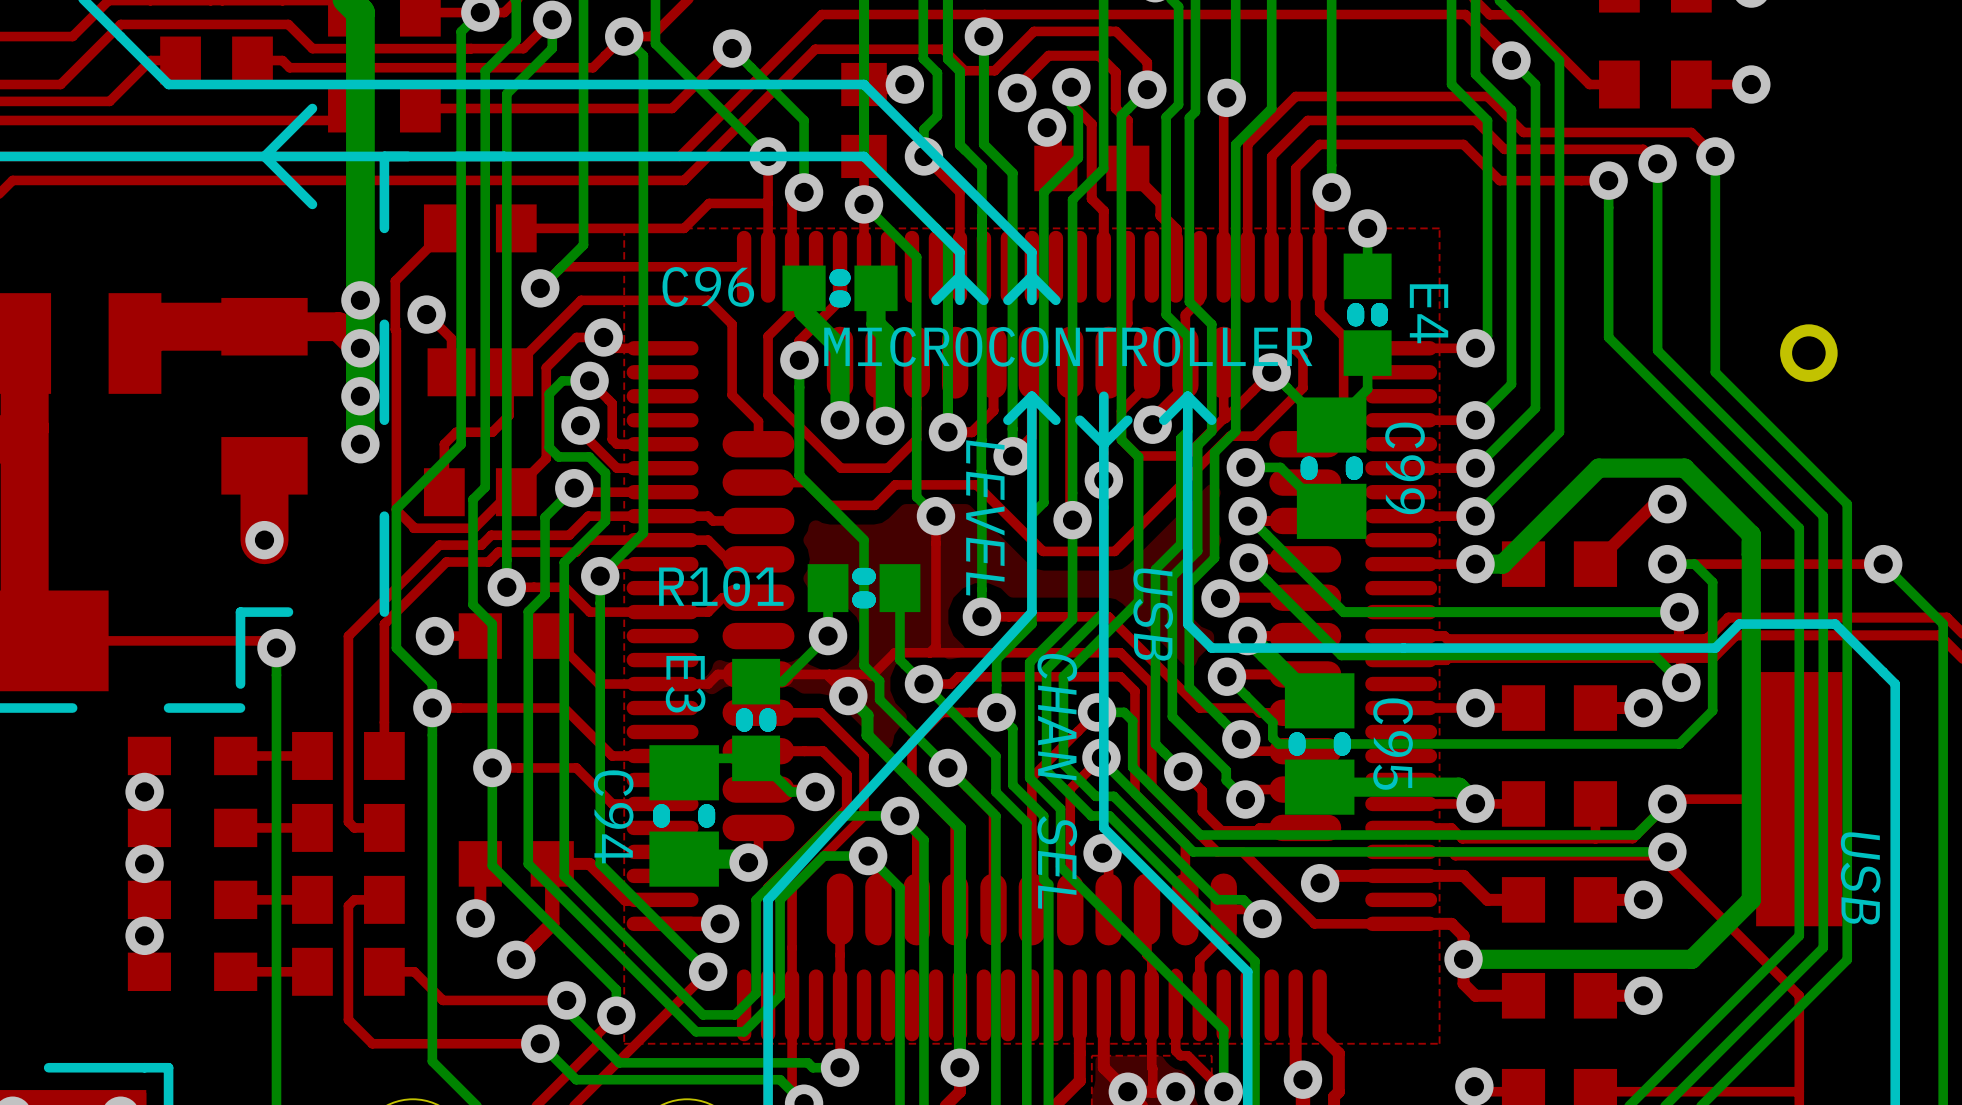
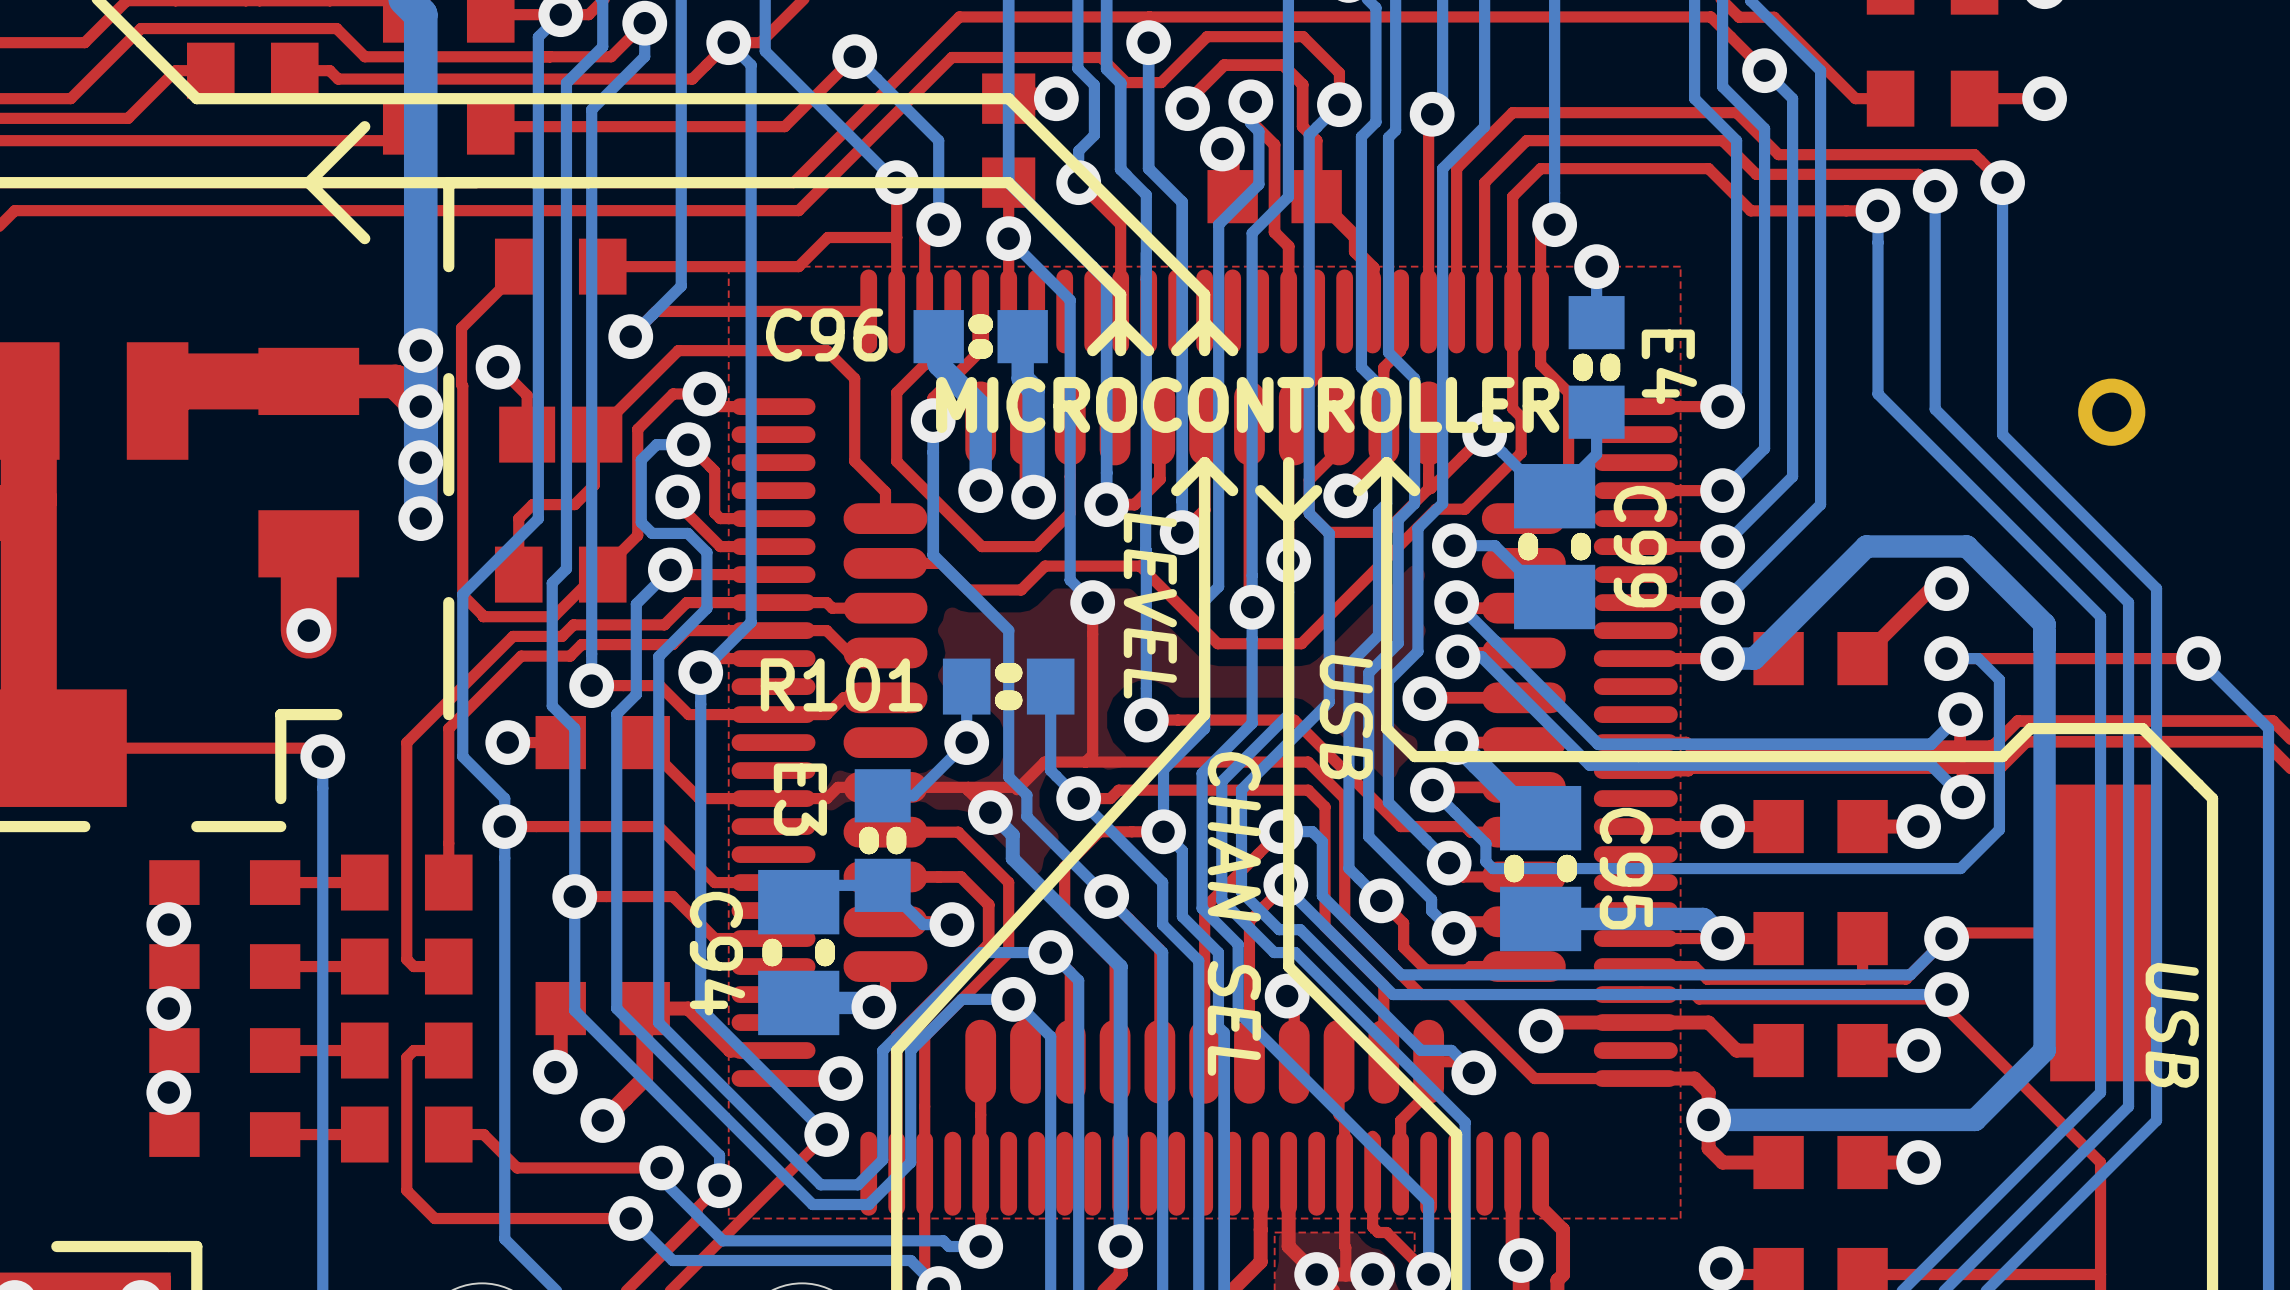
bottom track: (1248, 562) (1341, 655) (1361, 655) -> (1457, 656) (1481, 656) (1589, 764)
bottom track: (1679, 612) (1343, 612) -> (1960, 714) (1930, 744) (1598, 744) (1568, 714)

